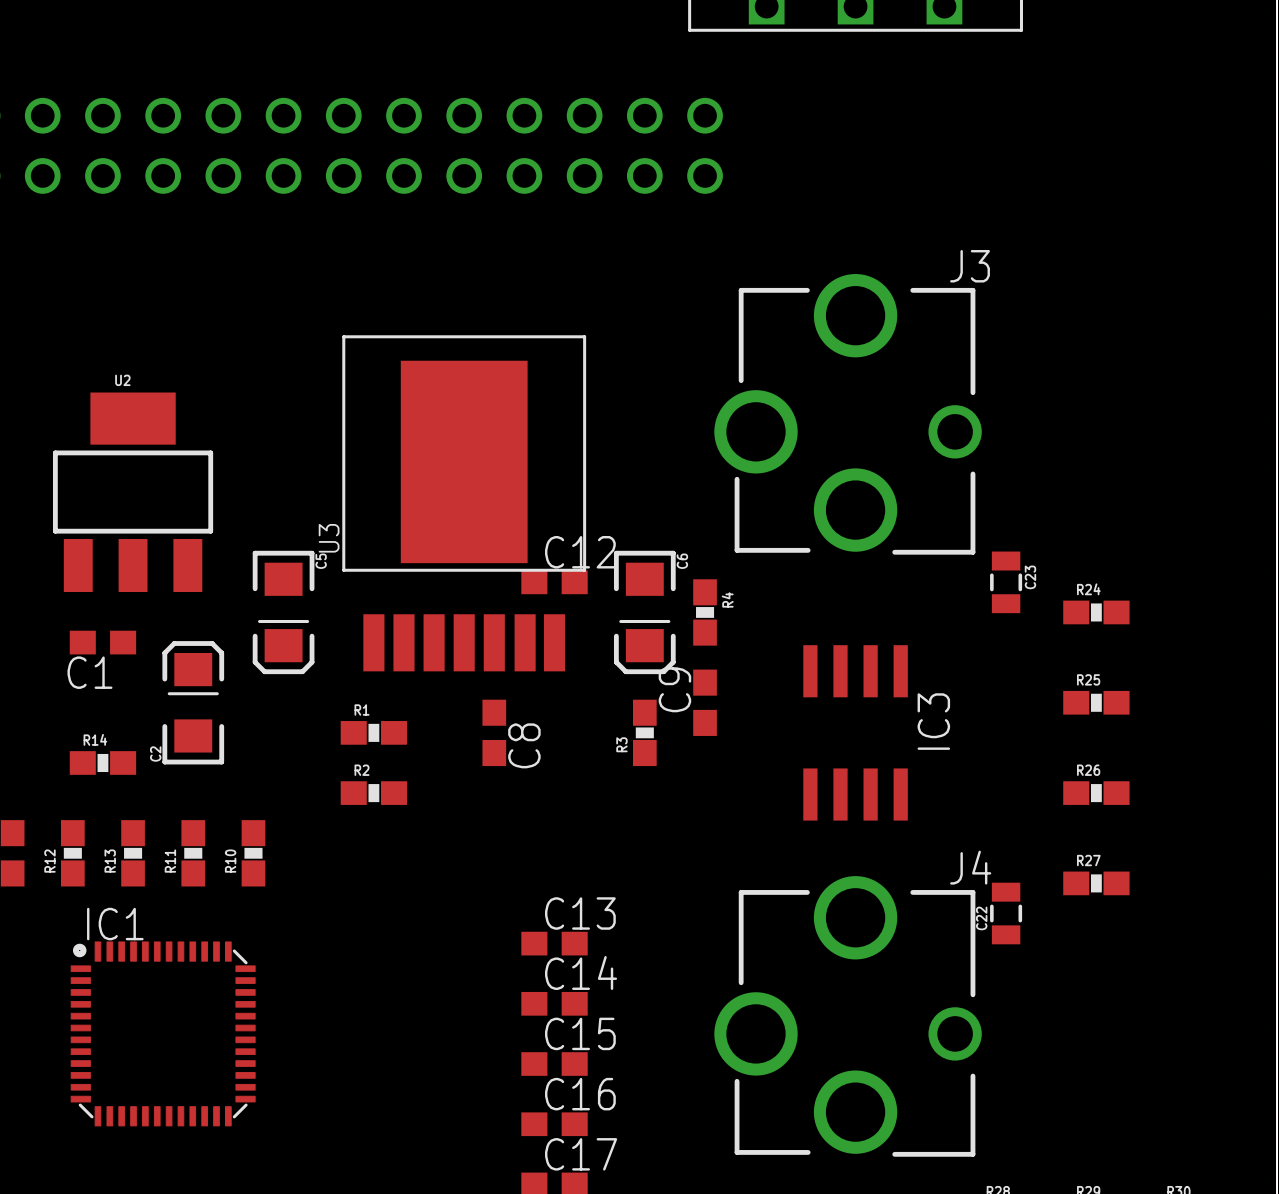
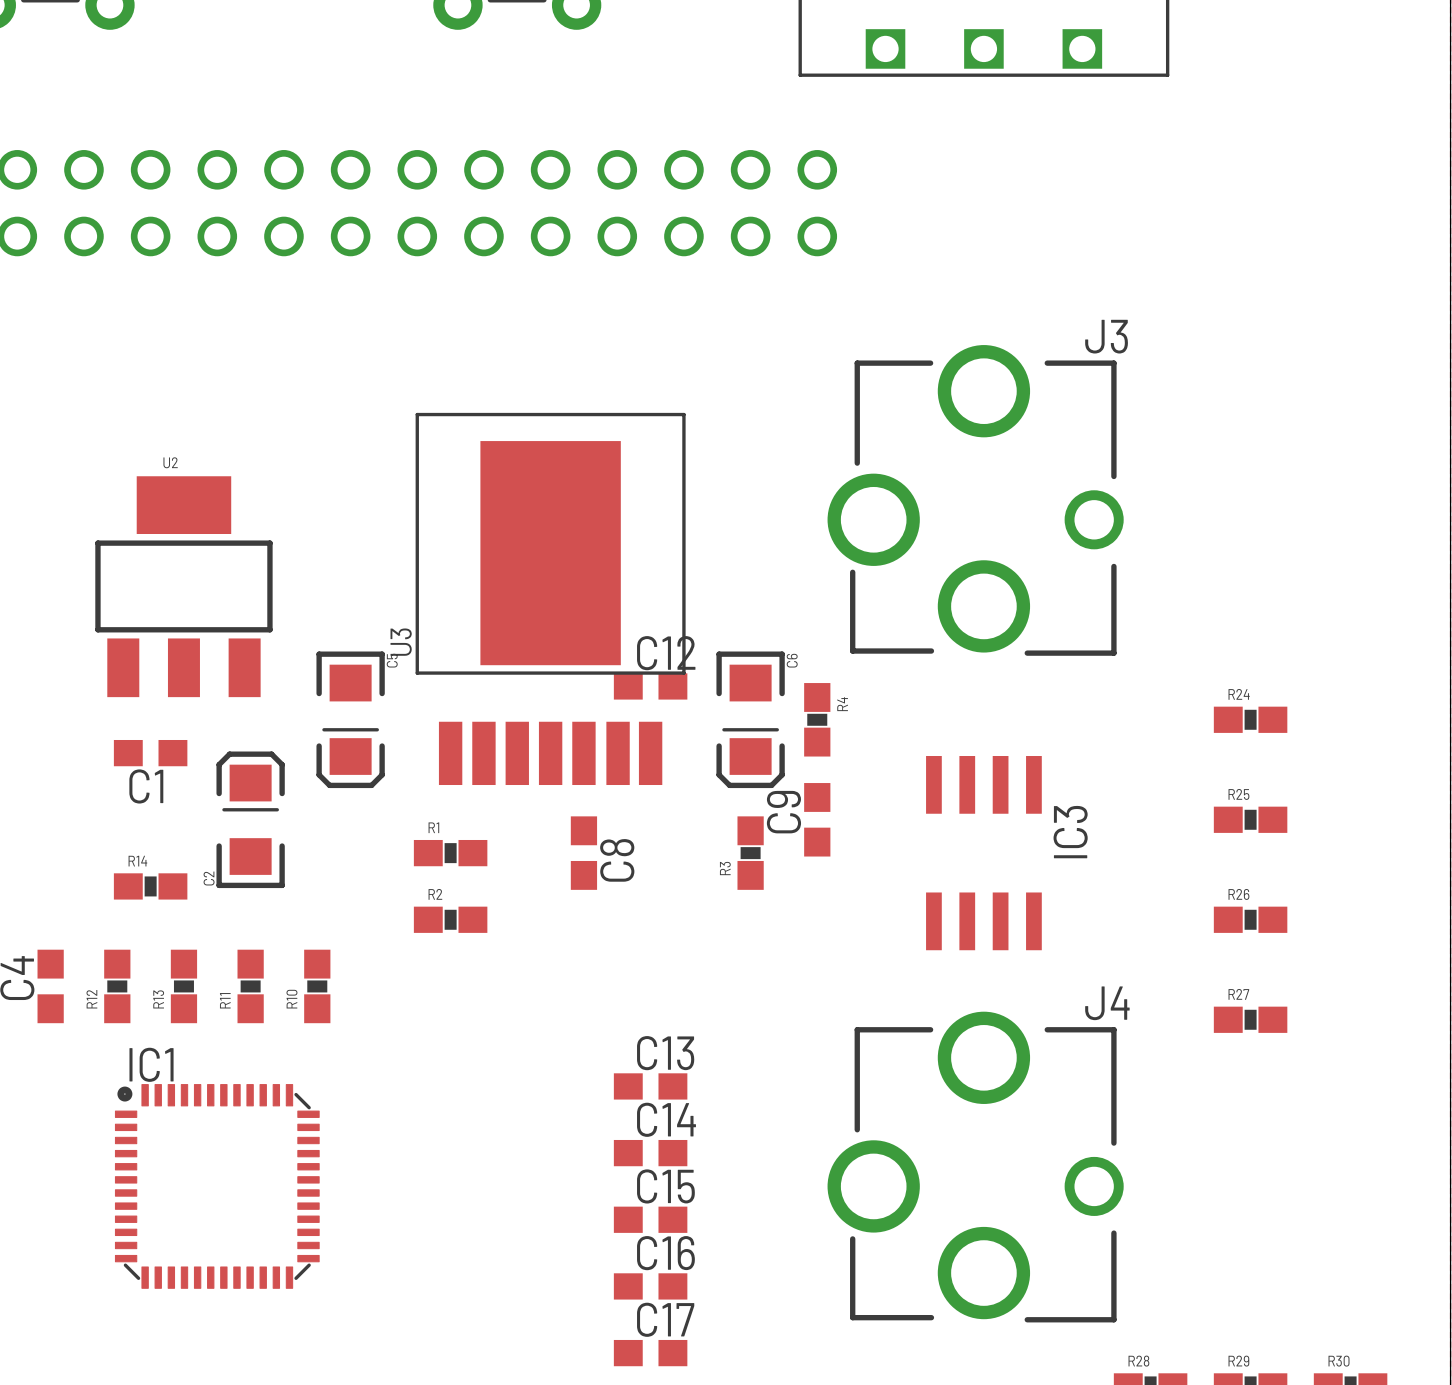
C23: (1006, 582) -> none
C22: (1006, 913) -> none

